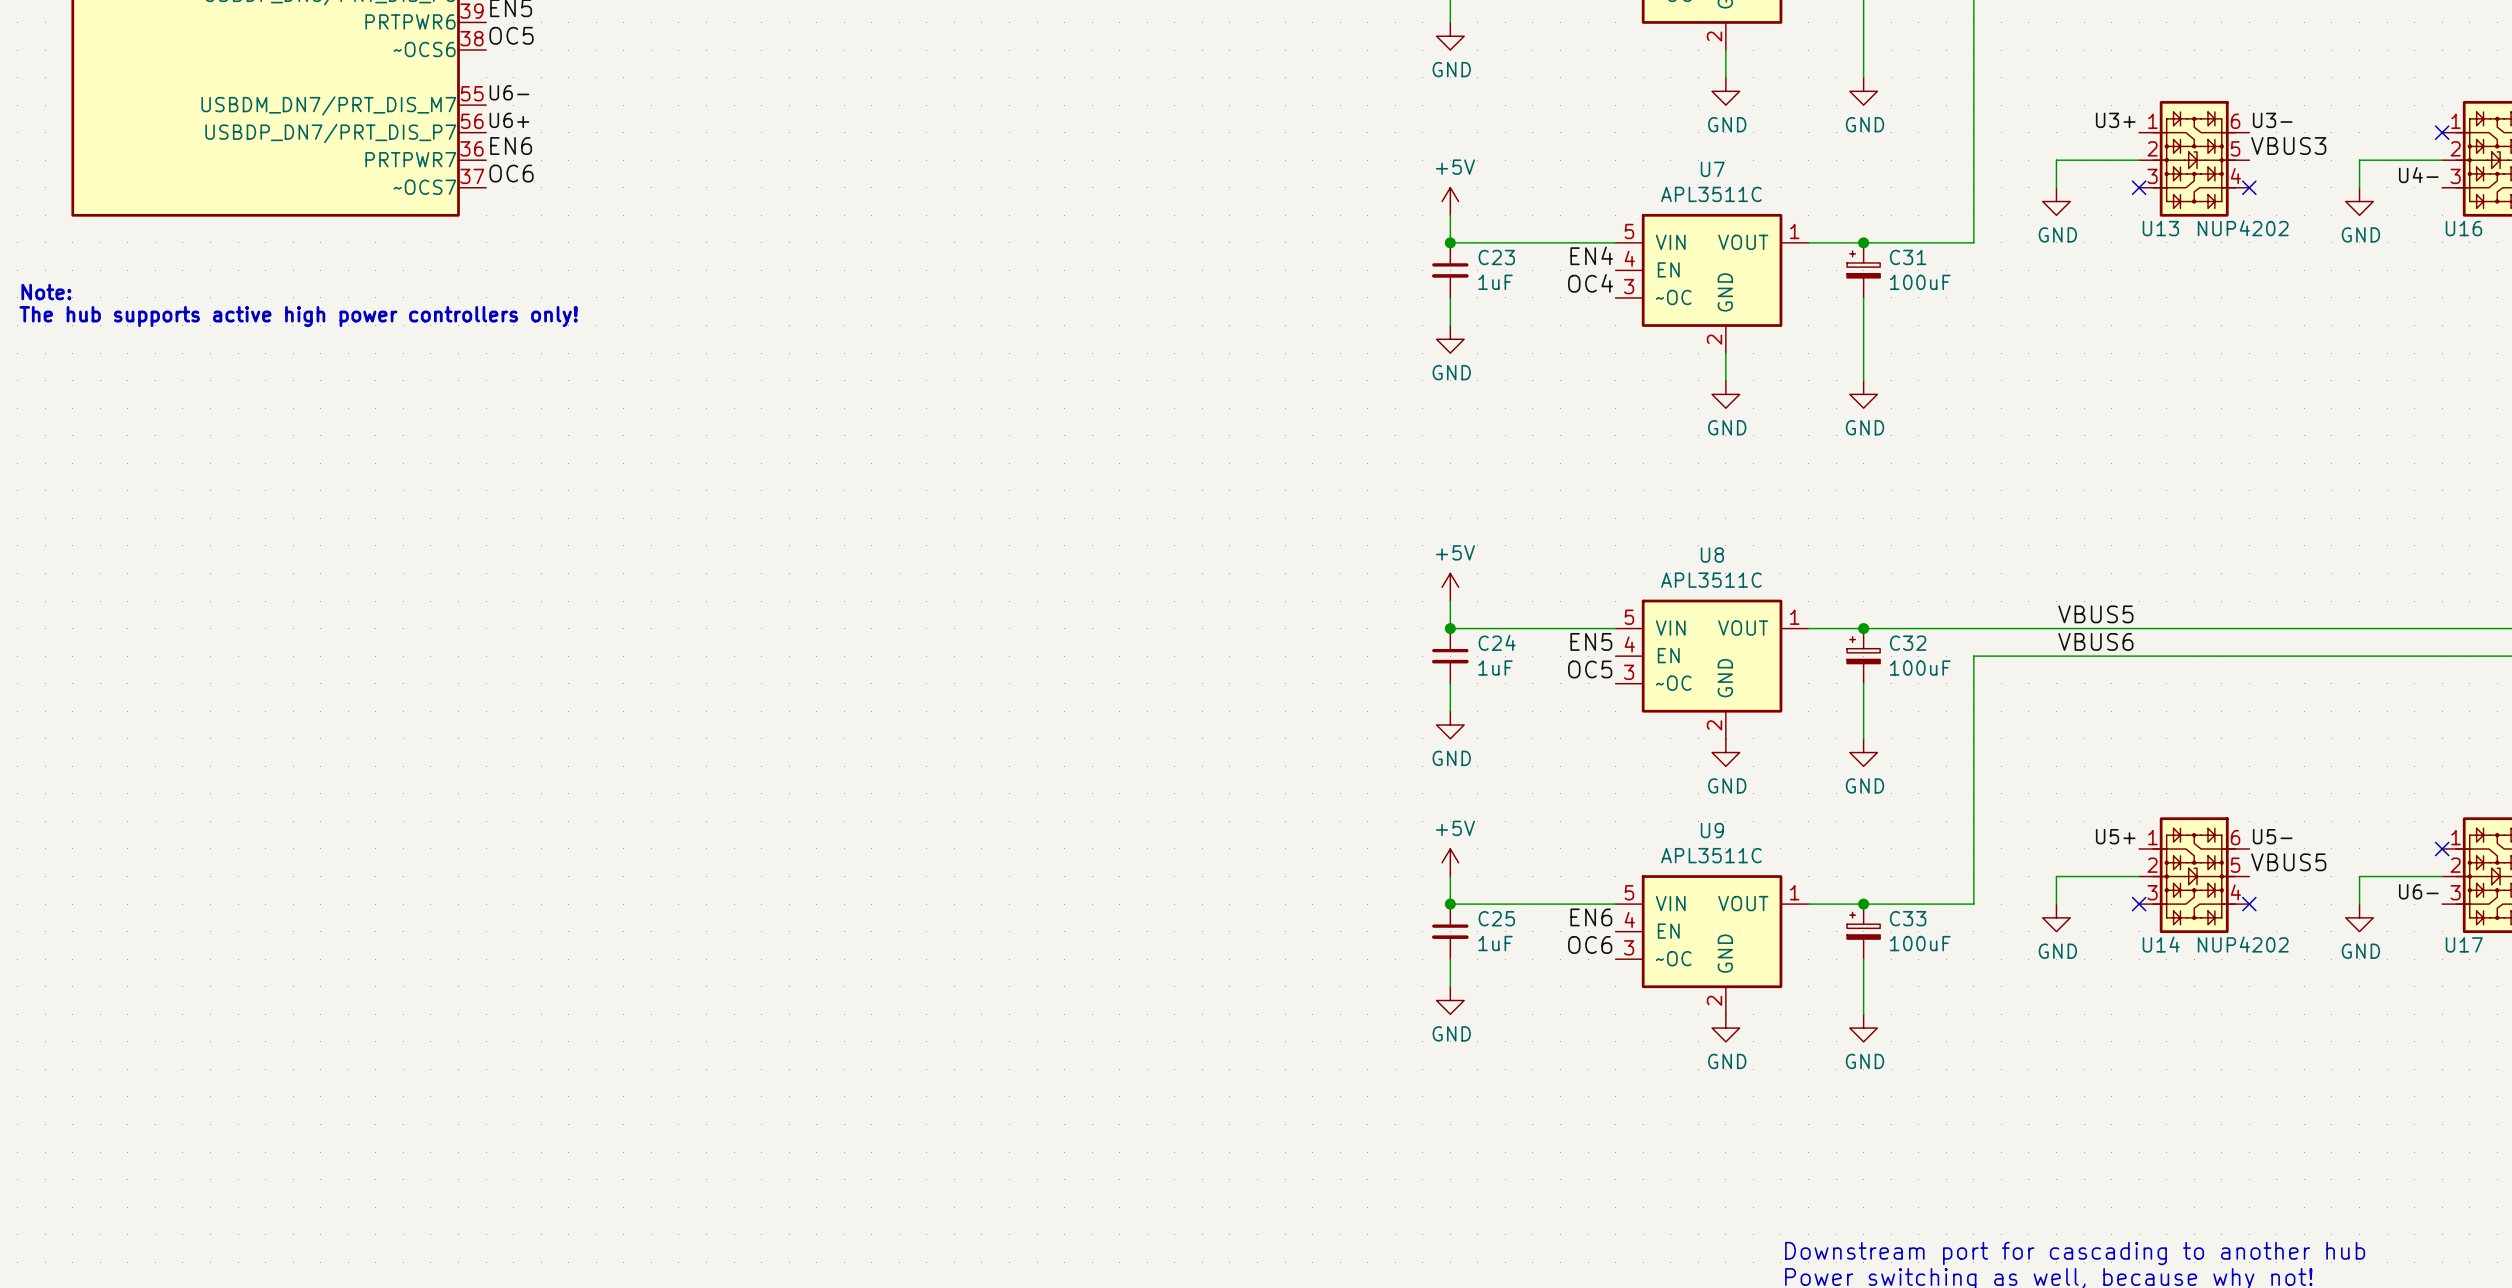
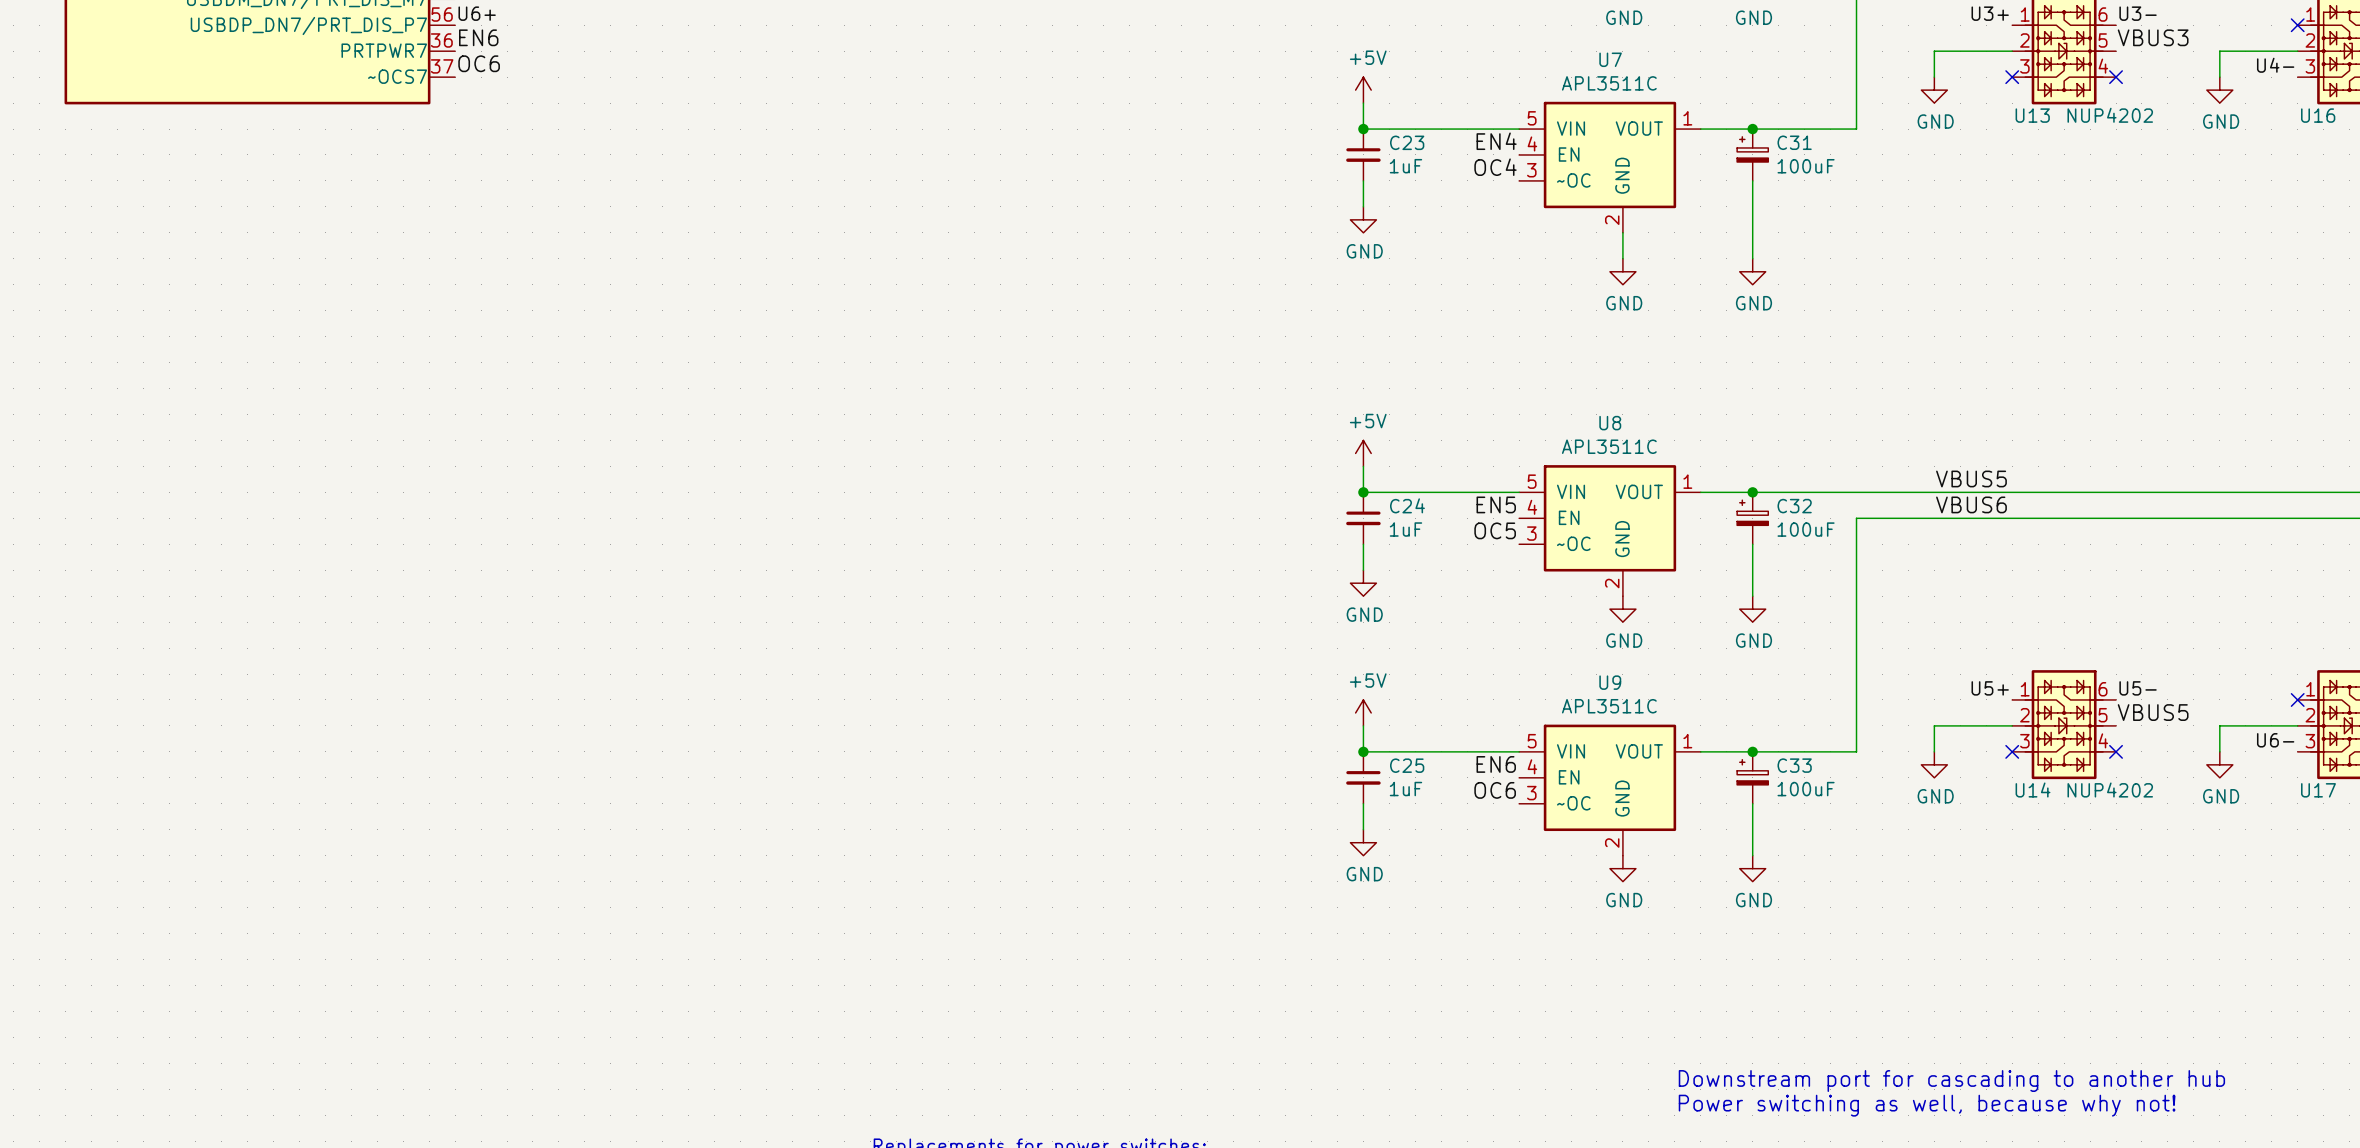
text: Note: (46, 292) -> none
text: The hub supports active high power controllers only! (298, 316) -> none

